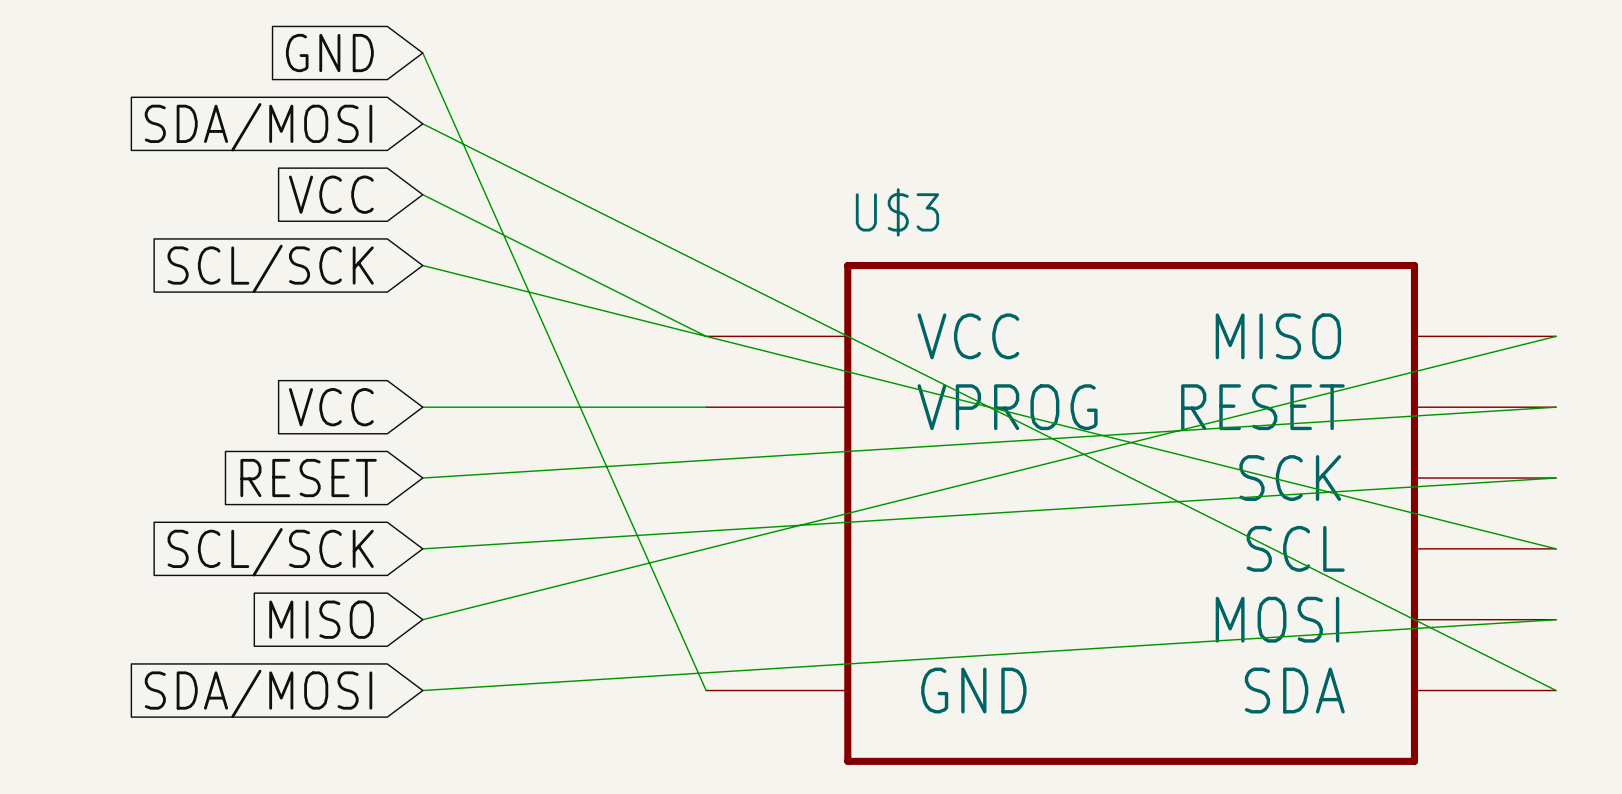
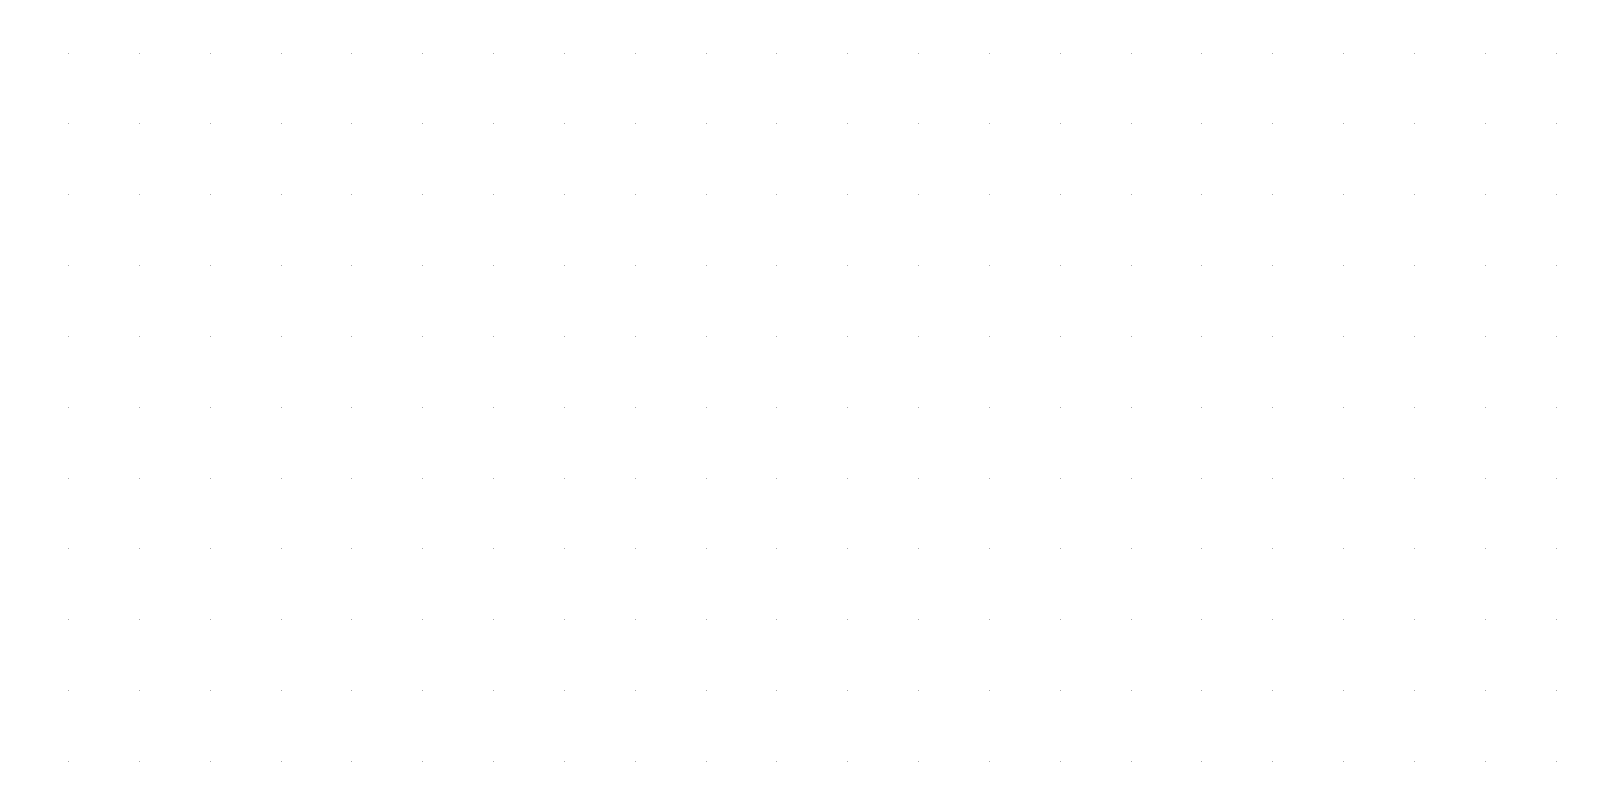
global label: GND (329, 53) -> none
wire: (422, 53) (706, 690) -> none
wire: (422, 123) (1556, 690) -> none
global label: SDA/MOSI (258, 127) -> none
global label: VCC (331, 194) -> none
wire: (422, 194) (706, 336) -> none
wire: (422, 265) (1556, 548) -> none
global label: SCL/SCK (270, 268) -> none
wire: (1556, 336) (422, 619) -> none
global label: VCC (331, 407) -> none
wire: (422, 407) (706, 407) -> none
wire: (1556, 407) (422, 478) -> none
global label: RESET (308, 478) -> none
wire: (1556, 478) (422, 548) -> none
U$3: (1131, 513) -> none
global label: SCL/SCK (270, 552) -> none
global label: MISO (321, 619) -> none
wire: (1556, 619) (422, 690) -> none
global label: SDA/MOSI (258, 693) -> none

